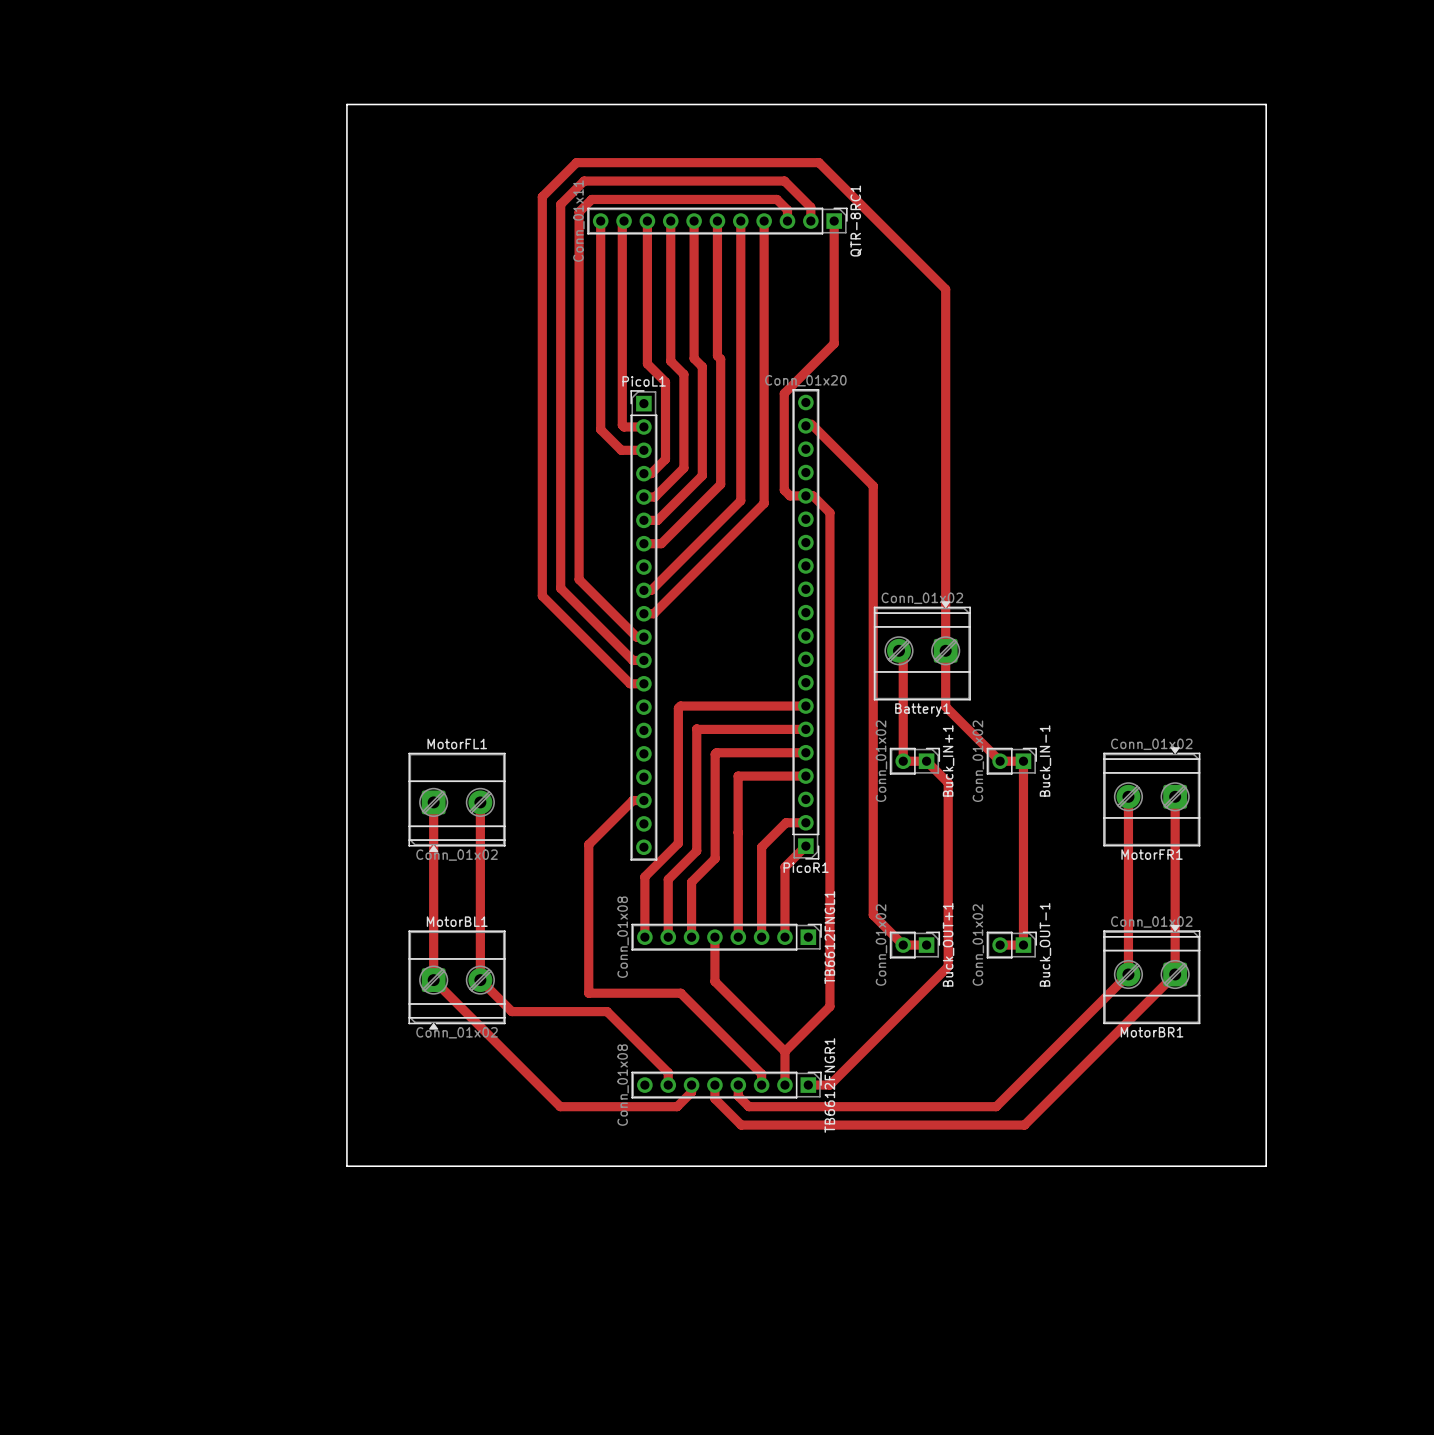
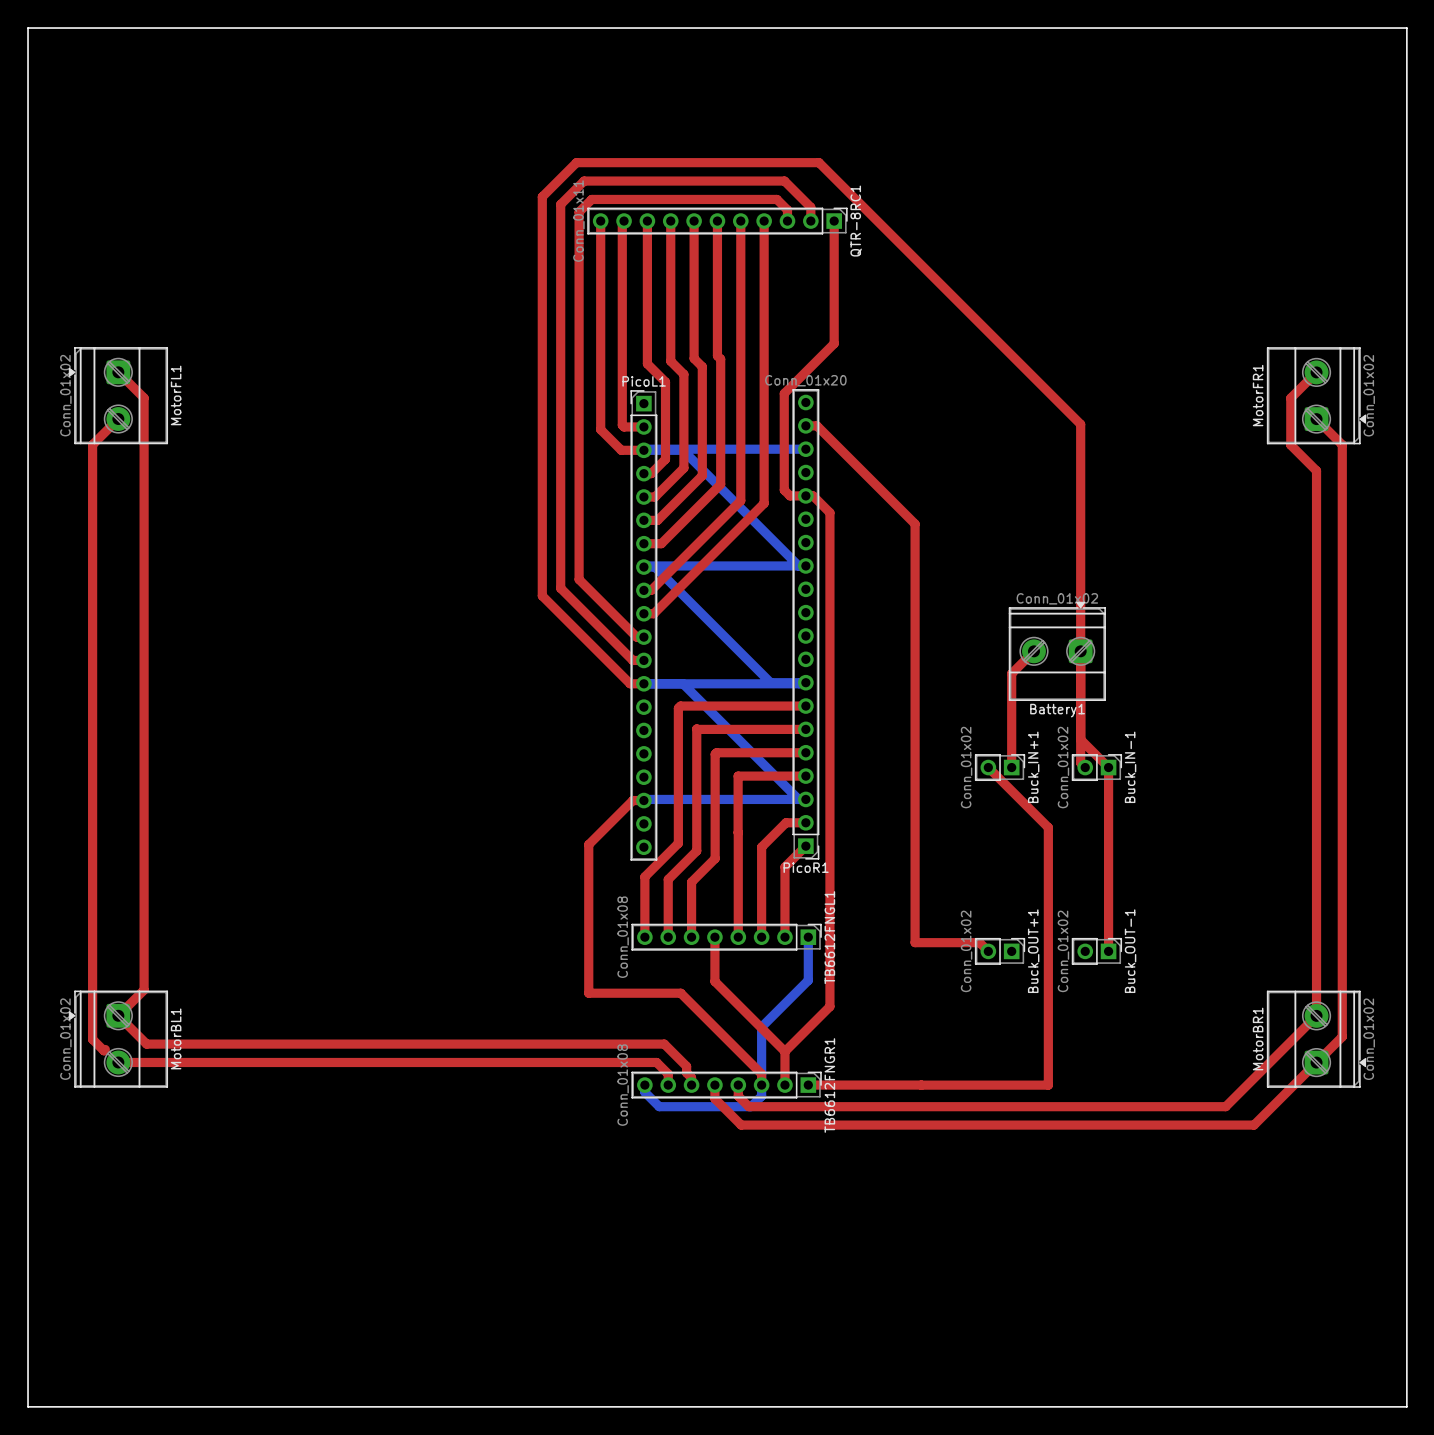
board edge: (346, 104) (1266, 104) (1266, 1166) (346, 1166) (346, 104) -> (28, 28) (28, 1406) (1406, 1406) (1406, 28) (28, 28)
top track: (945, 289) (945, 706) (1000, 761) (1023, 761) (1023, 945) (1000, 945) -> (945, 289) (1080, 424) (1080, 762) (1085, 767)
top track: none -> (118, 419) (92, 444) (92, 1039) (104, 1050) (105, 1049)
top track: (811, 424) (873, 486) (873, 915) (903, 945) (926, 945) -> none
top track: none -> (805, 425) (816, 425) (915, 524) (915, 942) (979, 942) (988, 951)
bottom track: none -> (805, 449) (643, 450) (683, 450) (798, 565)
bottom track: none -> (805, 565) (643, 567) (654, 567) (770, 682) (805, 682)
top track: (898, 650) (903, 655) (903, 761) (926, 761) (948, 782) (948, 966) (829, 1085) -> (921, 1085) (829, 1085)
Battery1 position: (922, 650) -> (1057, 651)
top track: none -> (1033, 651) (1011, 673) (1011, 767)
bottom track: none -> (800, 682) (643, 683)
bottom track: none -> (683, 683) (798, 799)
top track: none -> (1080, 739) (1108, 767) (1108, 951)
Buck_IN+1 position: (914, 761) -> (1000, 767)
Buck_IN-1 position: (1011, 761) -> (1096, 767)
top track: none -> (988, 767) (1048, 827) (1048, 1085) (921, 1085)
top track: (1128, 796) (1128, 974) (996, 1106) -> (1316, 372) (1290, 398) (1290, 445) (1316, 470) (1316, 1015) (1225, 1106) (996, 1106)
MotorFR1 rotation: 0° (1151, 796) -> 90° clockwise (1316, 395)
MotorFR1 position: (1151, 796) -> (1316, 395)
top track: (1175, 796) (1175, 974) (1024, 1125) -> (1316, 419) (1342, 444) (1342, 1036) (1254, 1125) (1024, 1125)
bottom track: none -> (805, 799) (643, 800)
top track: (433, 802) (433, 980) (560, 1106) (677, 1106) (691, 1092) (691, 1085) -> (118, 372) (144, 398) (144, 990) (118, 1015) (146, 1044) (664, 1044) (686, 1066) (686, 1072) (691, 1077) (691, 1085)
MotorFL1 rotation: 0° (457, 802) -> 90° clockwise (118, 395)
MotorFL1 position: (457, 802) -> (118, 395)
top track: (480, 802) (480, 980) (511, 1011) (607, 1011) (668, 1074) -> (118, 1062) (656, 1062) (668, 1074)
bottom track: none -> (808, 937) (808, 980) (761, 1027) (761, 1096) (751, 1106) (659, 1106) (644, 1092) (644, 1085)
Buck_OUT+1 position: (914, 945) -> (1000, 951)
Buck_OUT-1 position: (1011, 945) -> (1096, 951)
MotorBR1 rotation: 0° (1151, 974) -> 90° clockwise (1316, 1039)
MotorBR1 position: (1151, 974) -> (1316, 1039)
MotorBL1 rotation: 0° (457, 980) -> 90° clockwise (118, 1039)
MotorBL1 position: (457, 980) -> (118, 1039)

